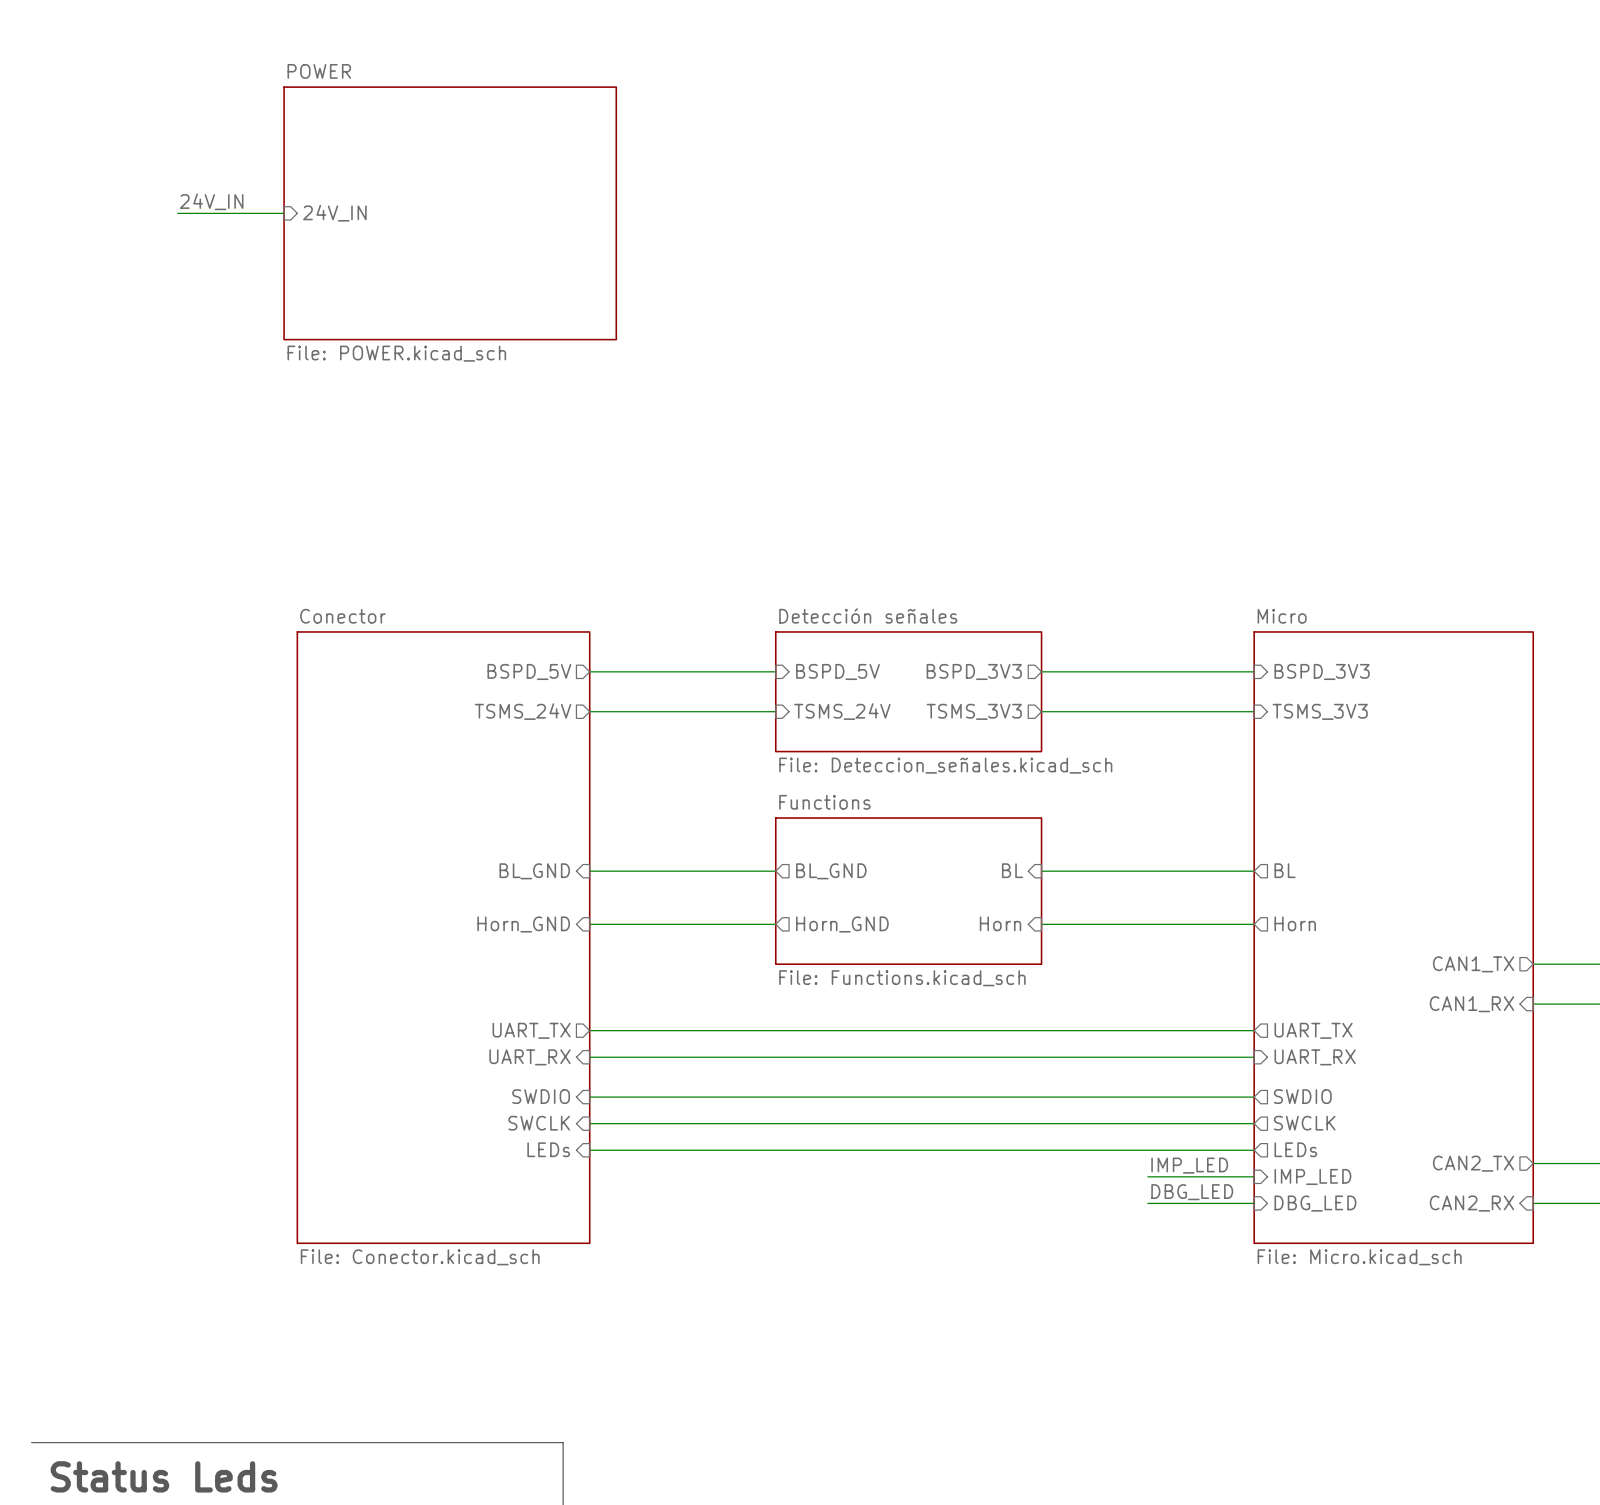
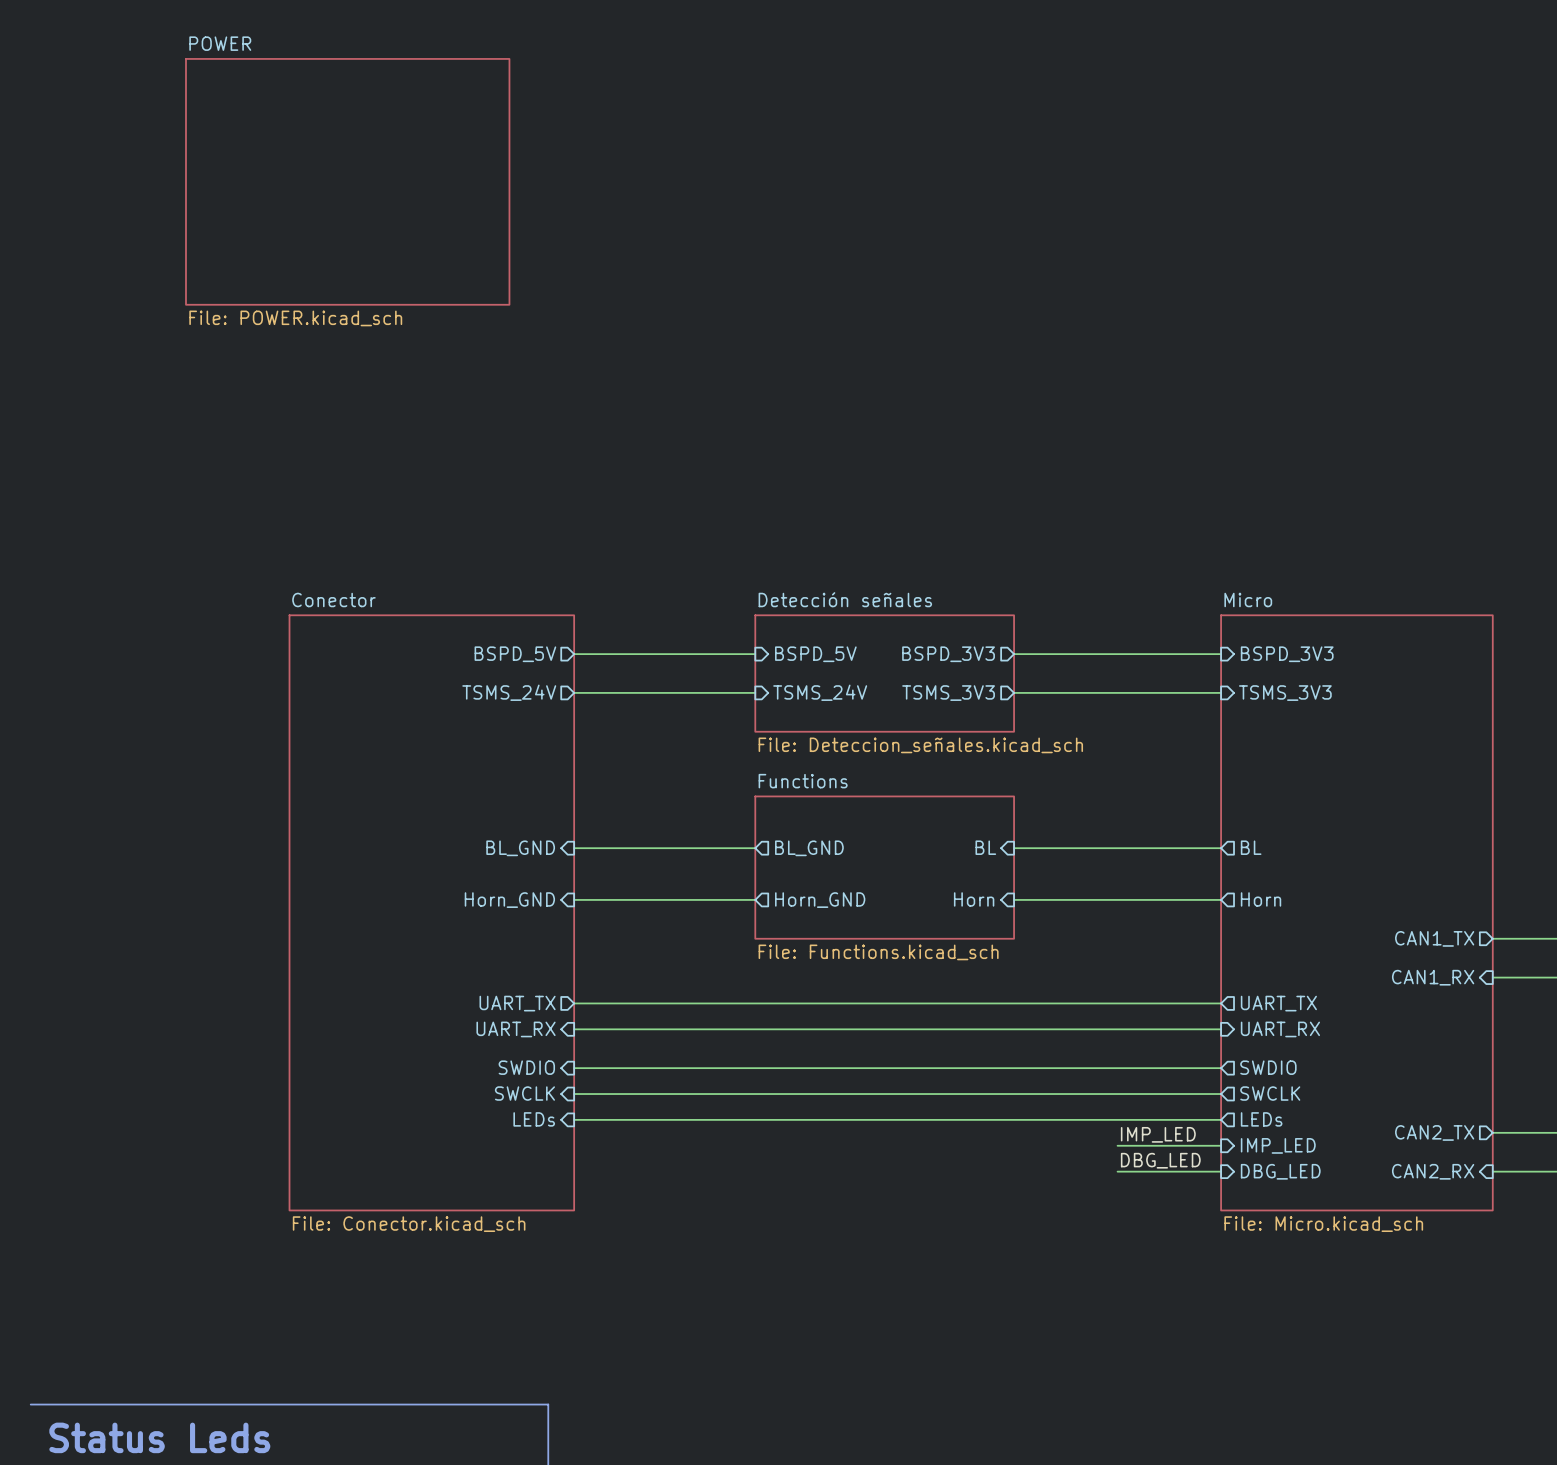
label: 24V_IN (211, 201) -> none
wire: (177, 213) (284, 213) -> none
sheet pin: 24V_IN (334, 213) -> none
sheet POWER position: (450, 213) -> (347, 181)

